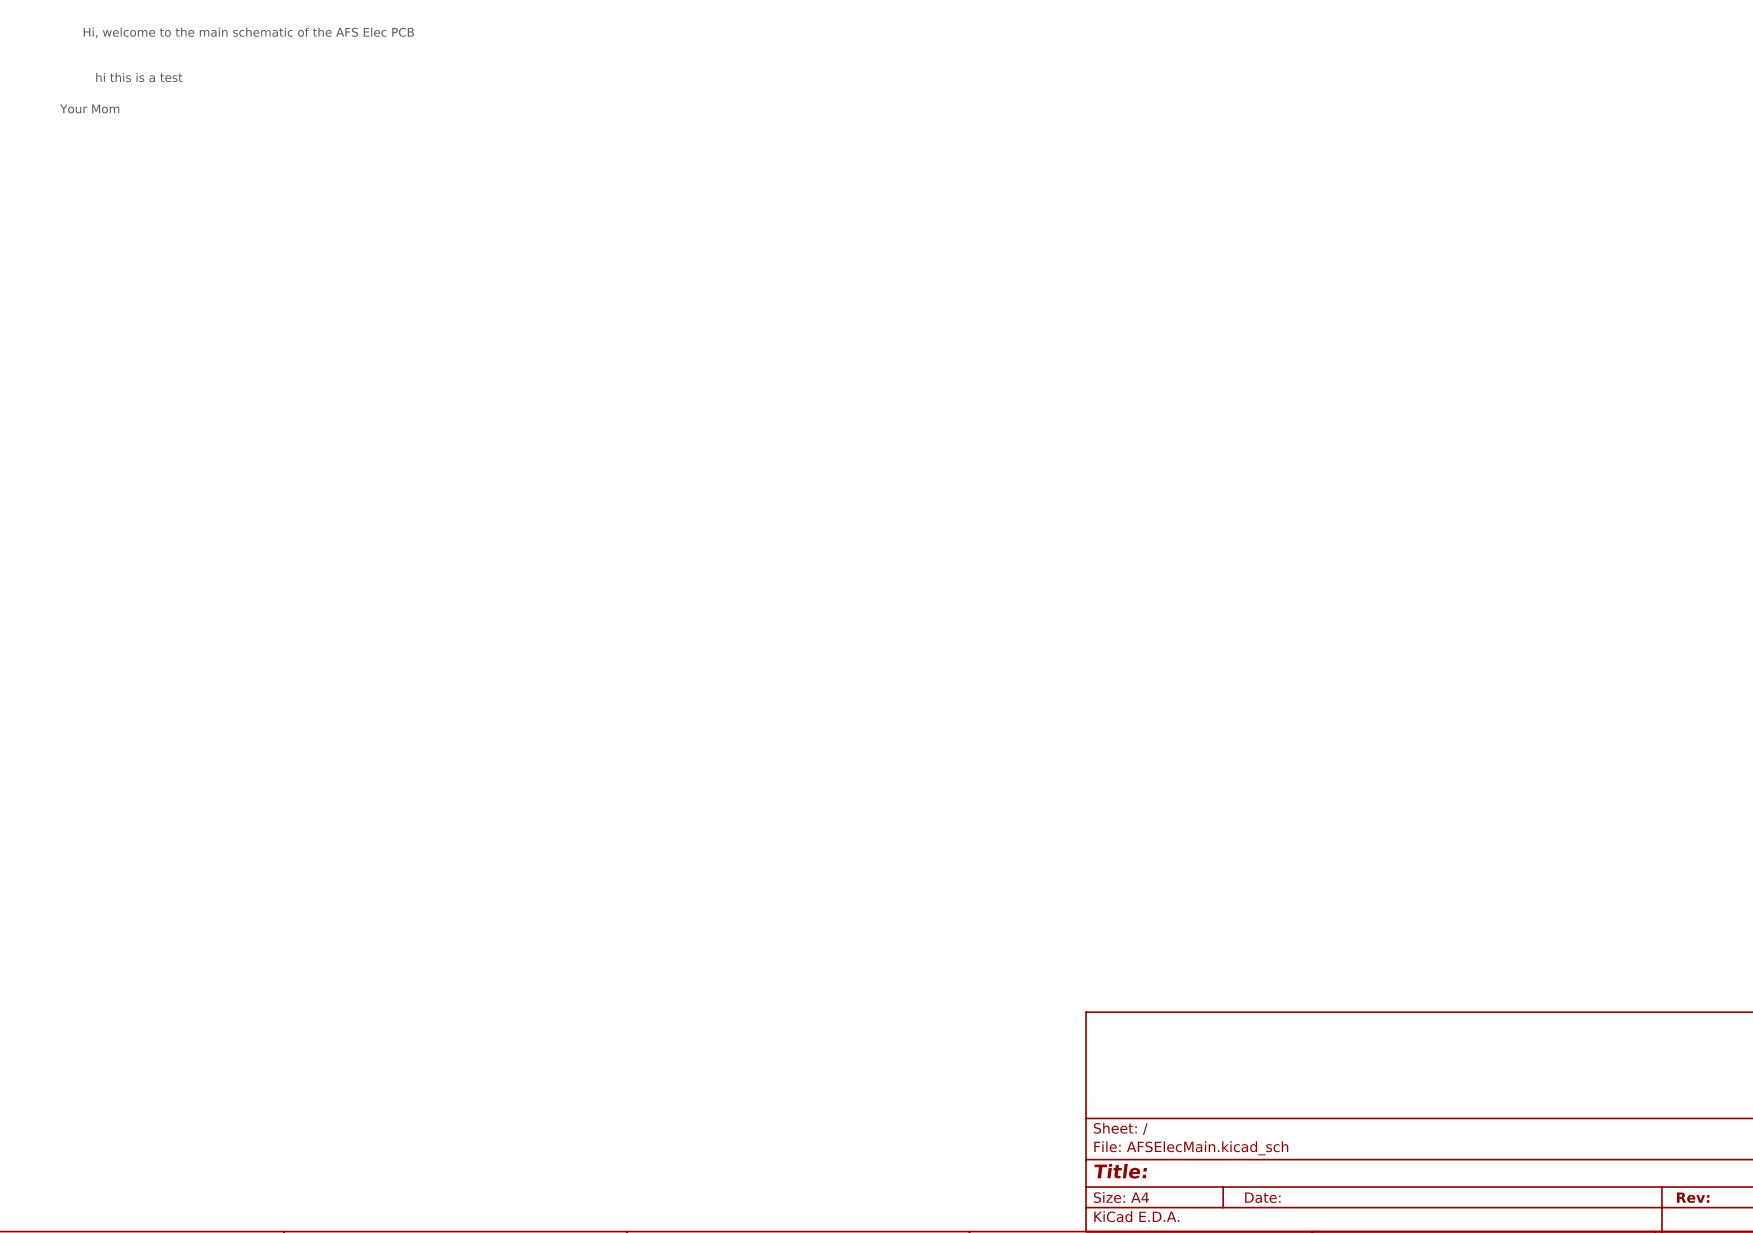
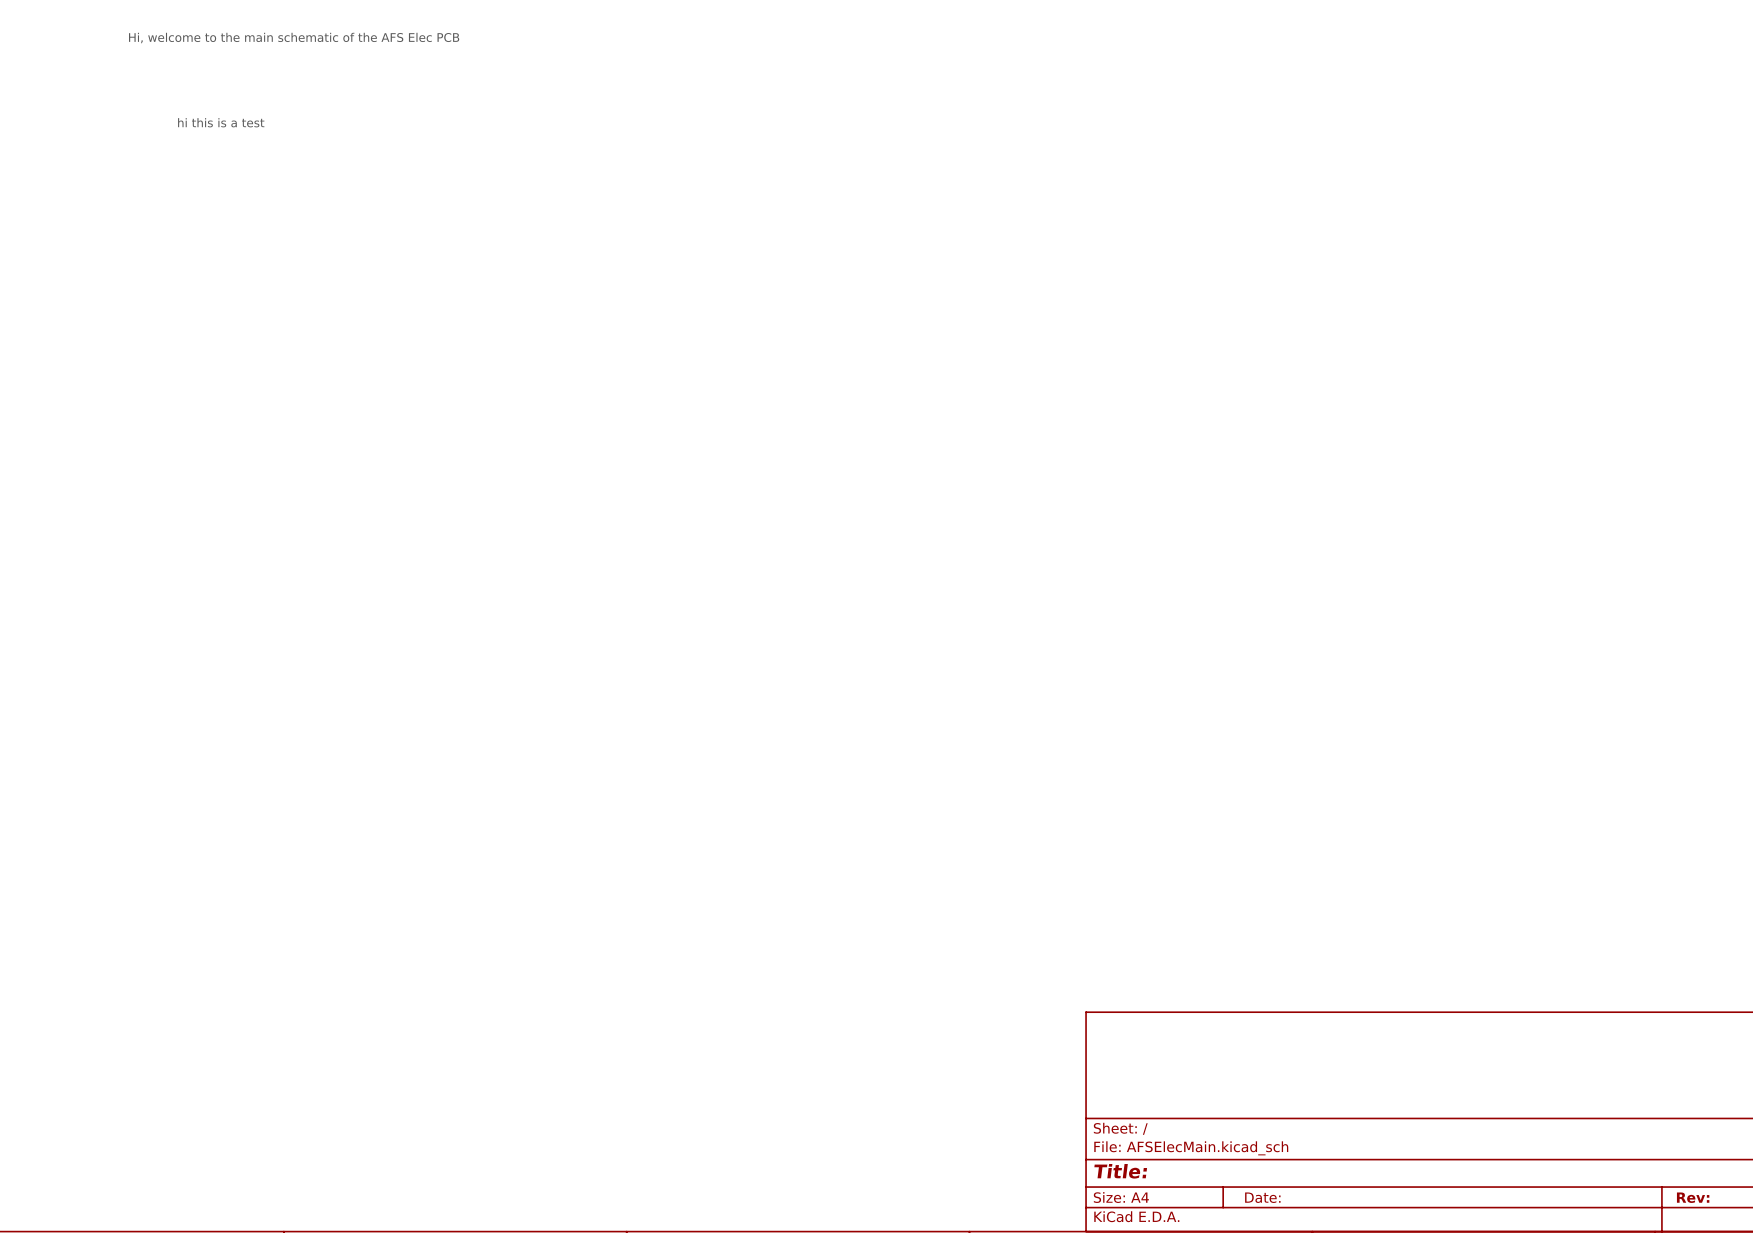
text position: Hi, welcome to the main schematic of the AFS Elec PCB (248, 32) -> Hi, welcome to the main schematic of the AFS Elec PCB (294, 38)
text position: hi this is a test (139, 77) -> hi this is a test (221, 122)
text: Your Mom (89, 108) -> none

